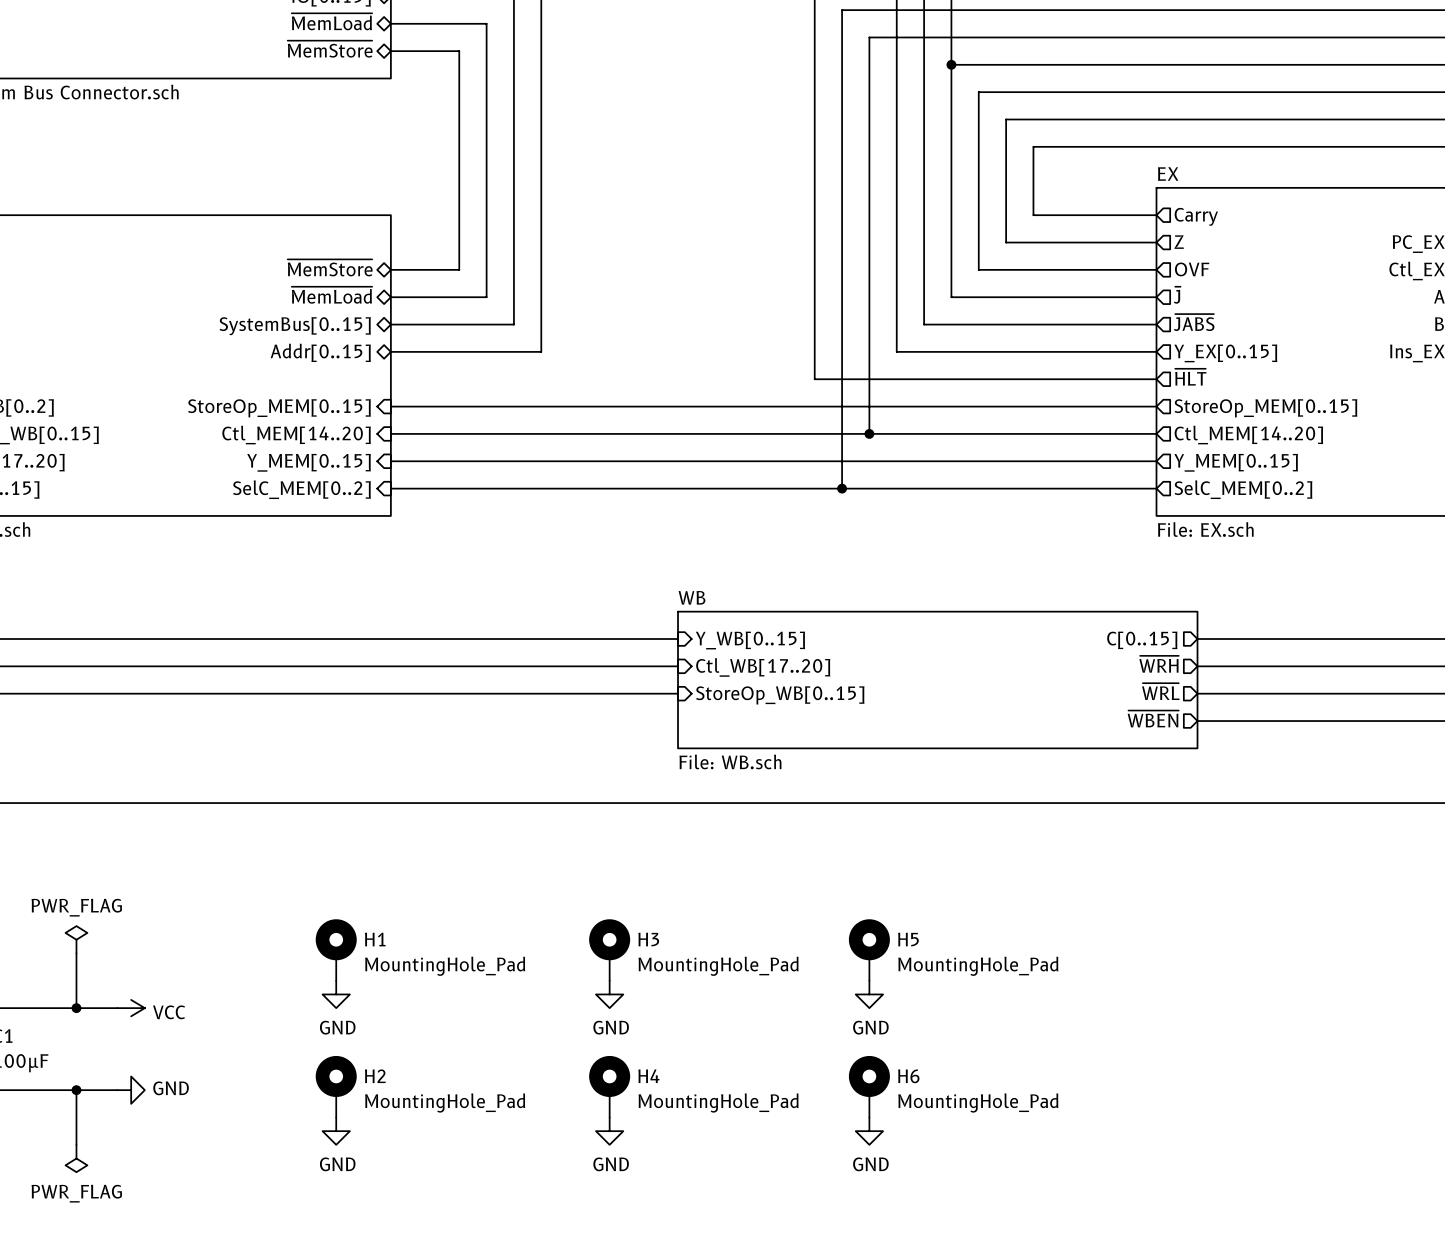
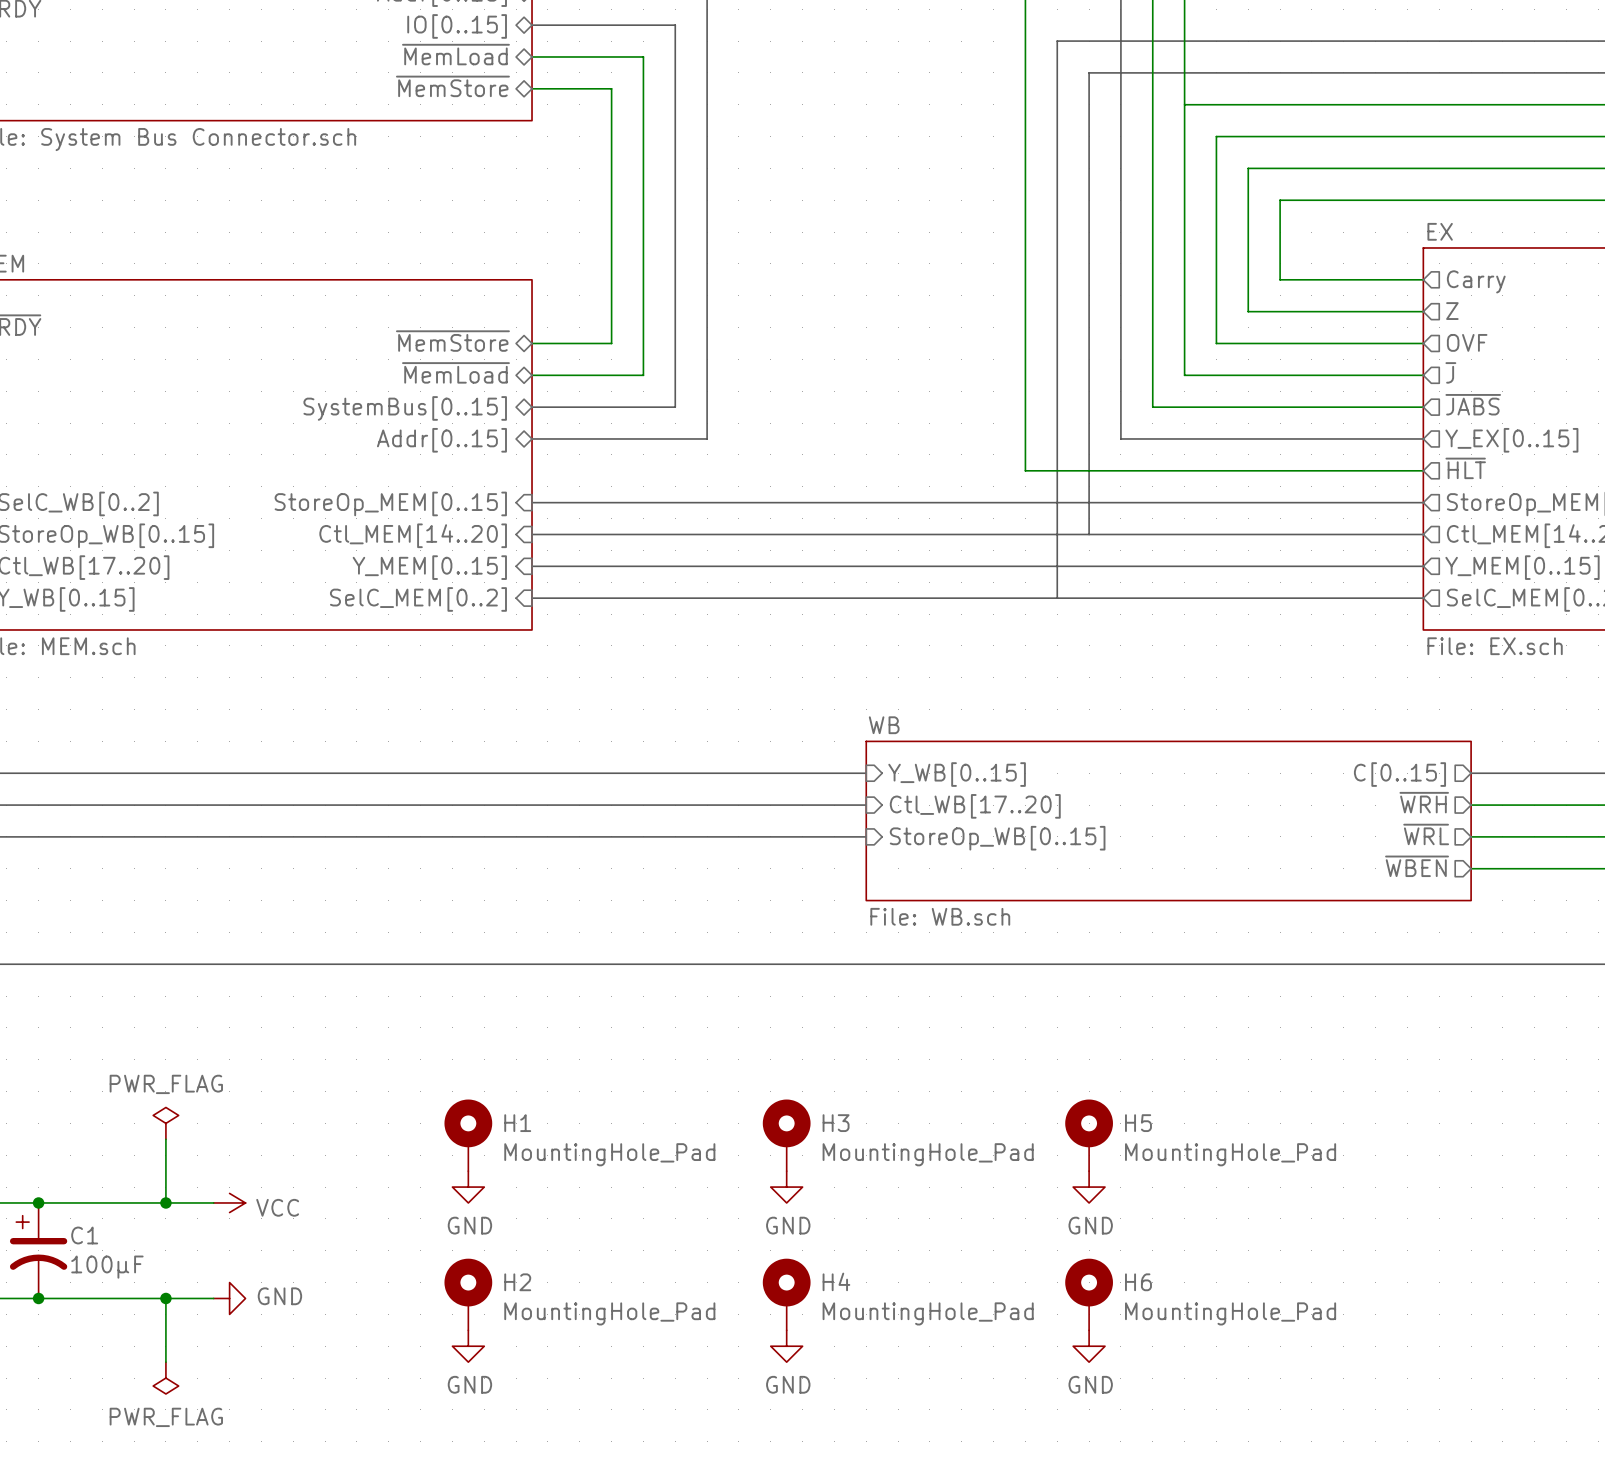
junction: (951, 64) -> none
junction: (869, 433) -> none
junction: (842, 488) -> none

